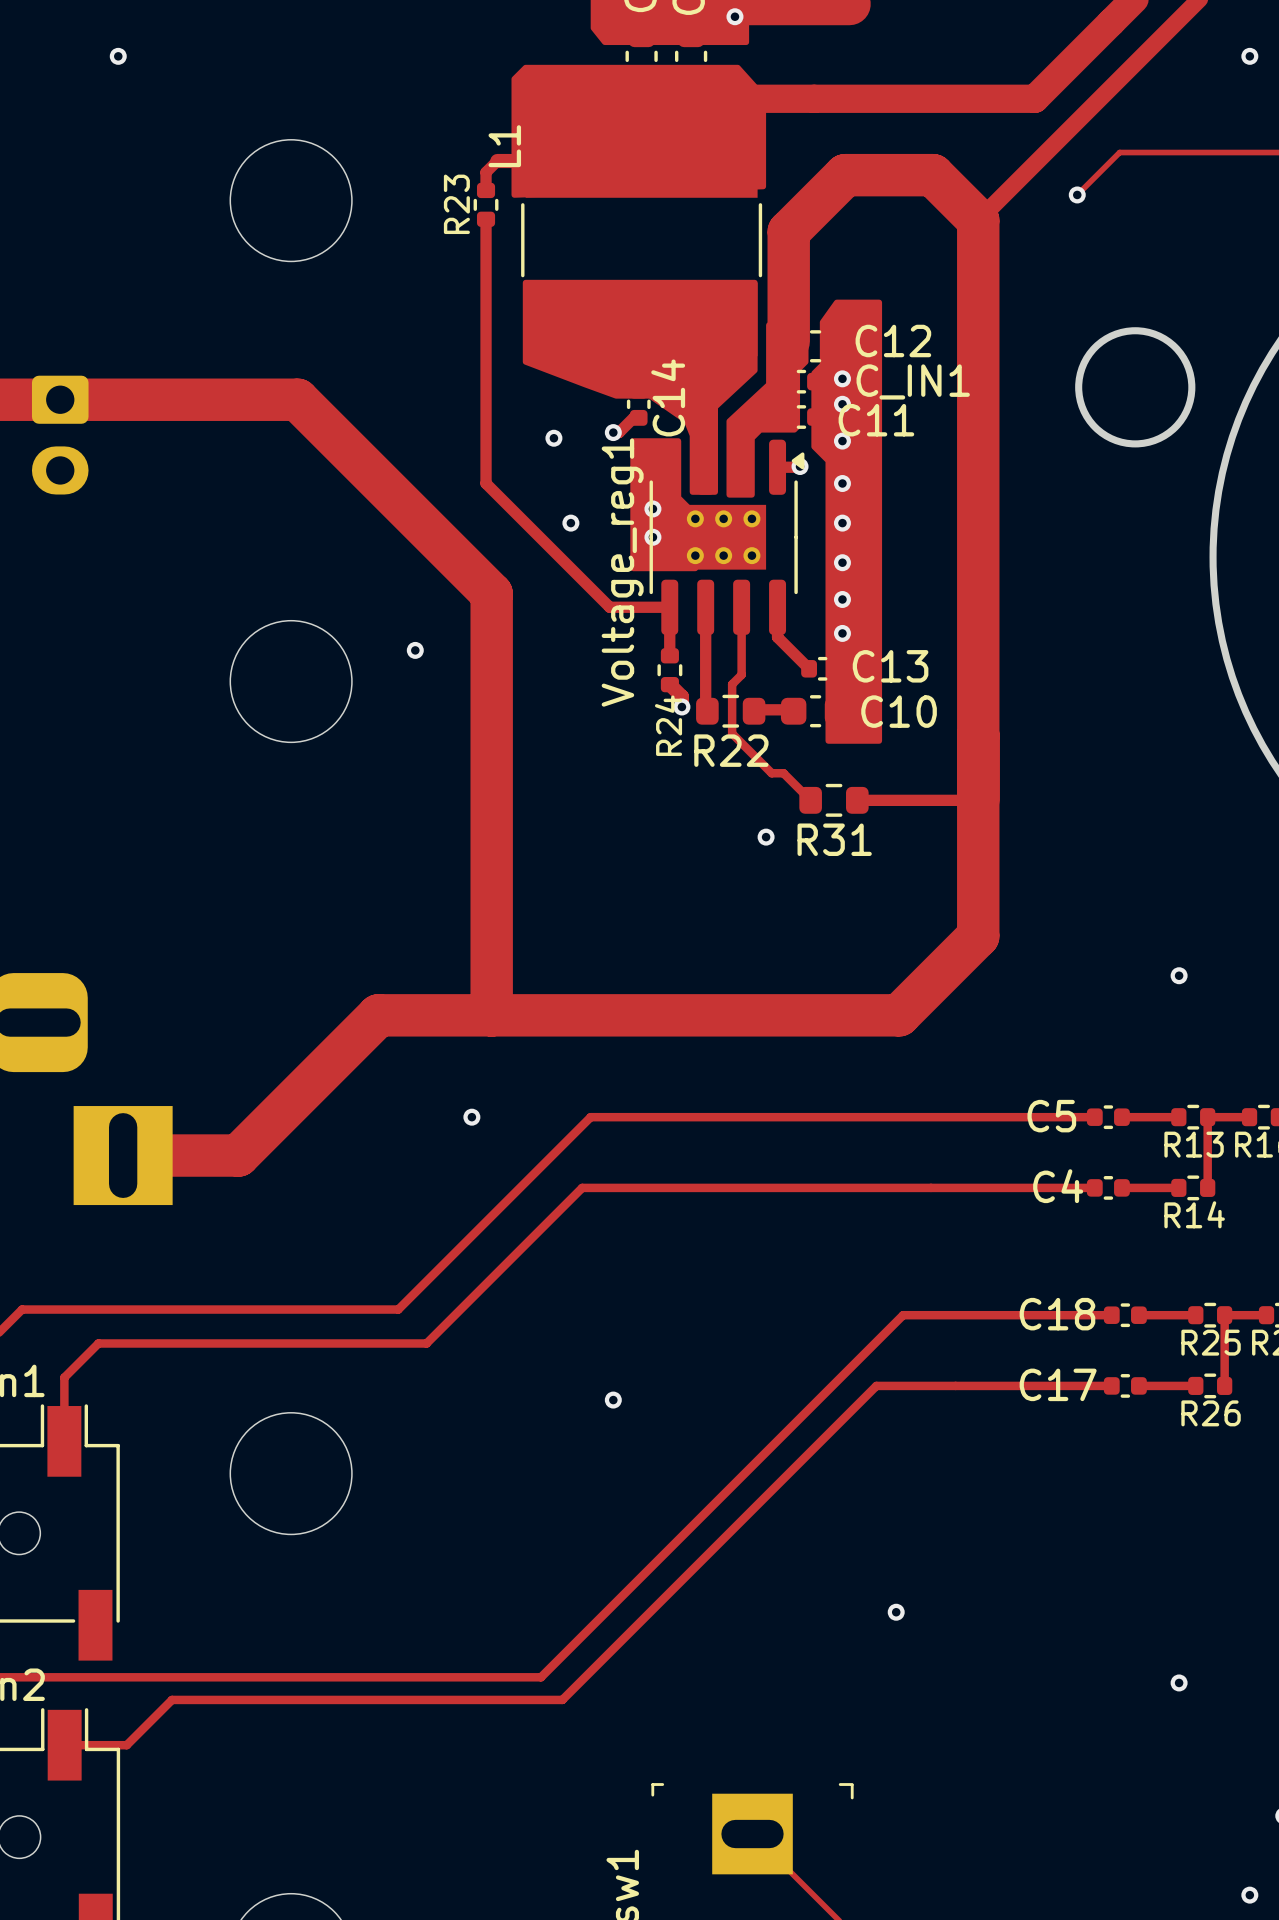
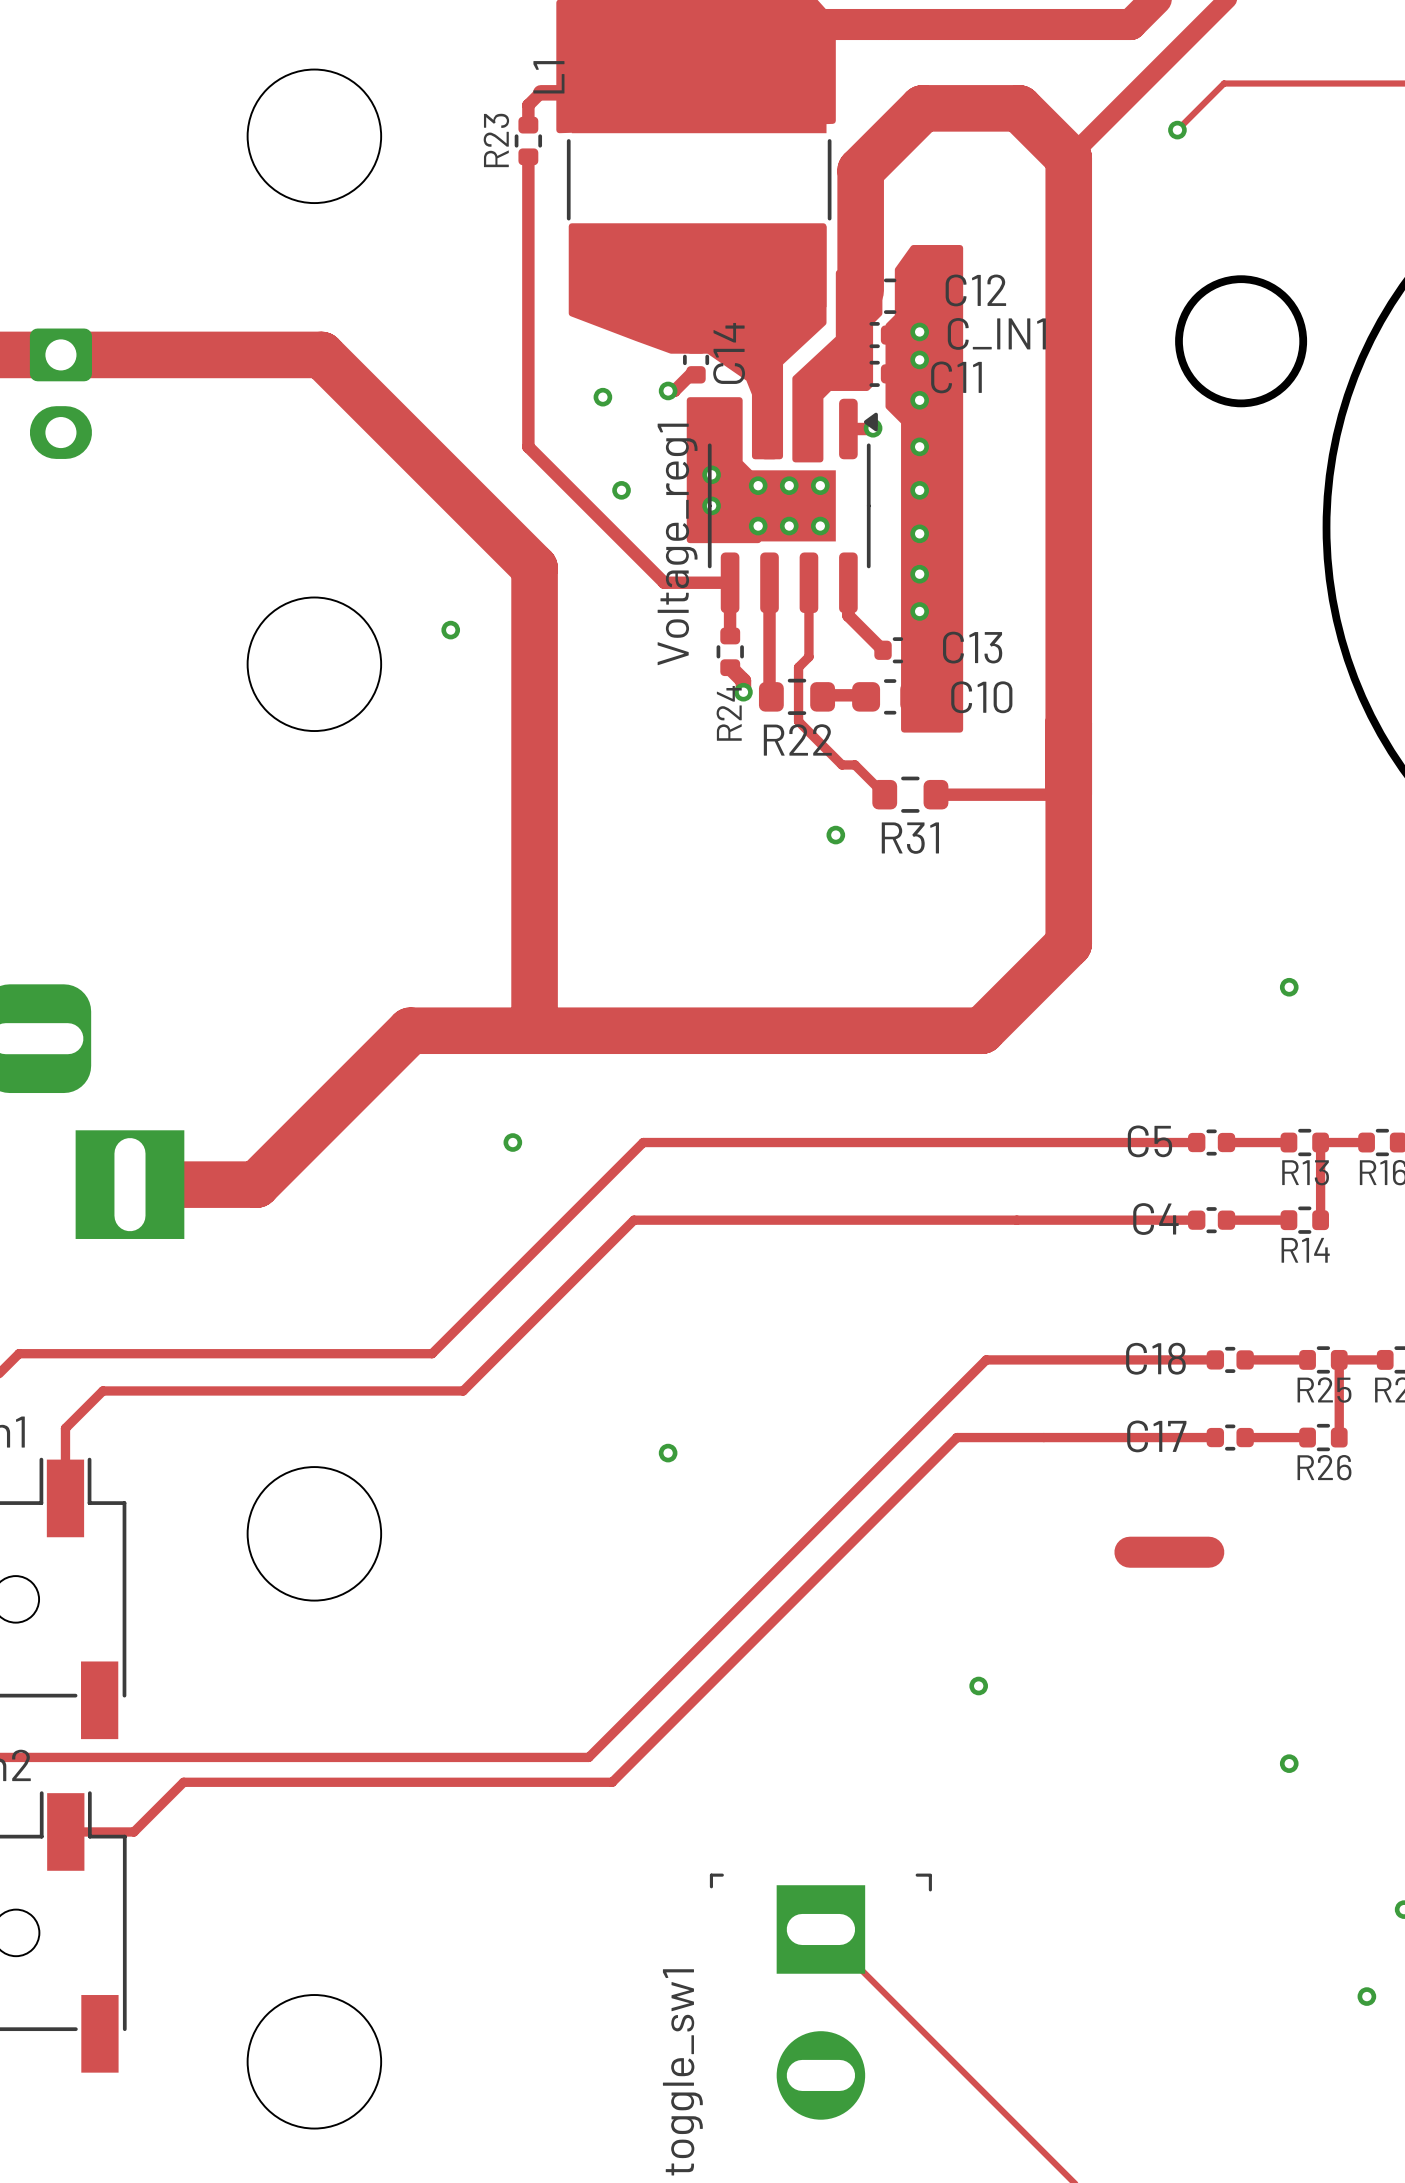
track: none -> (1129, 1552) (1208, 1552)

